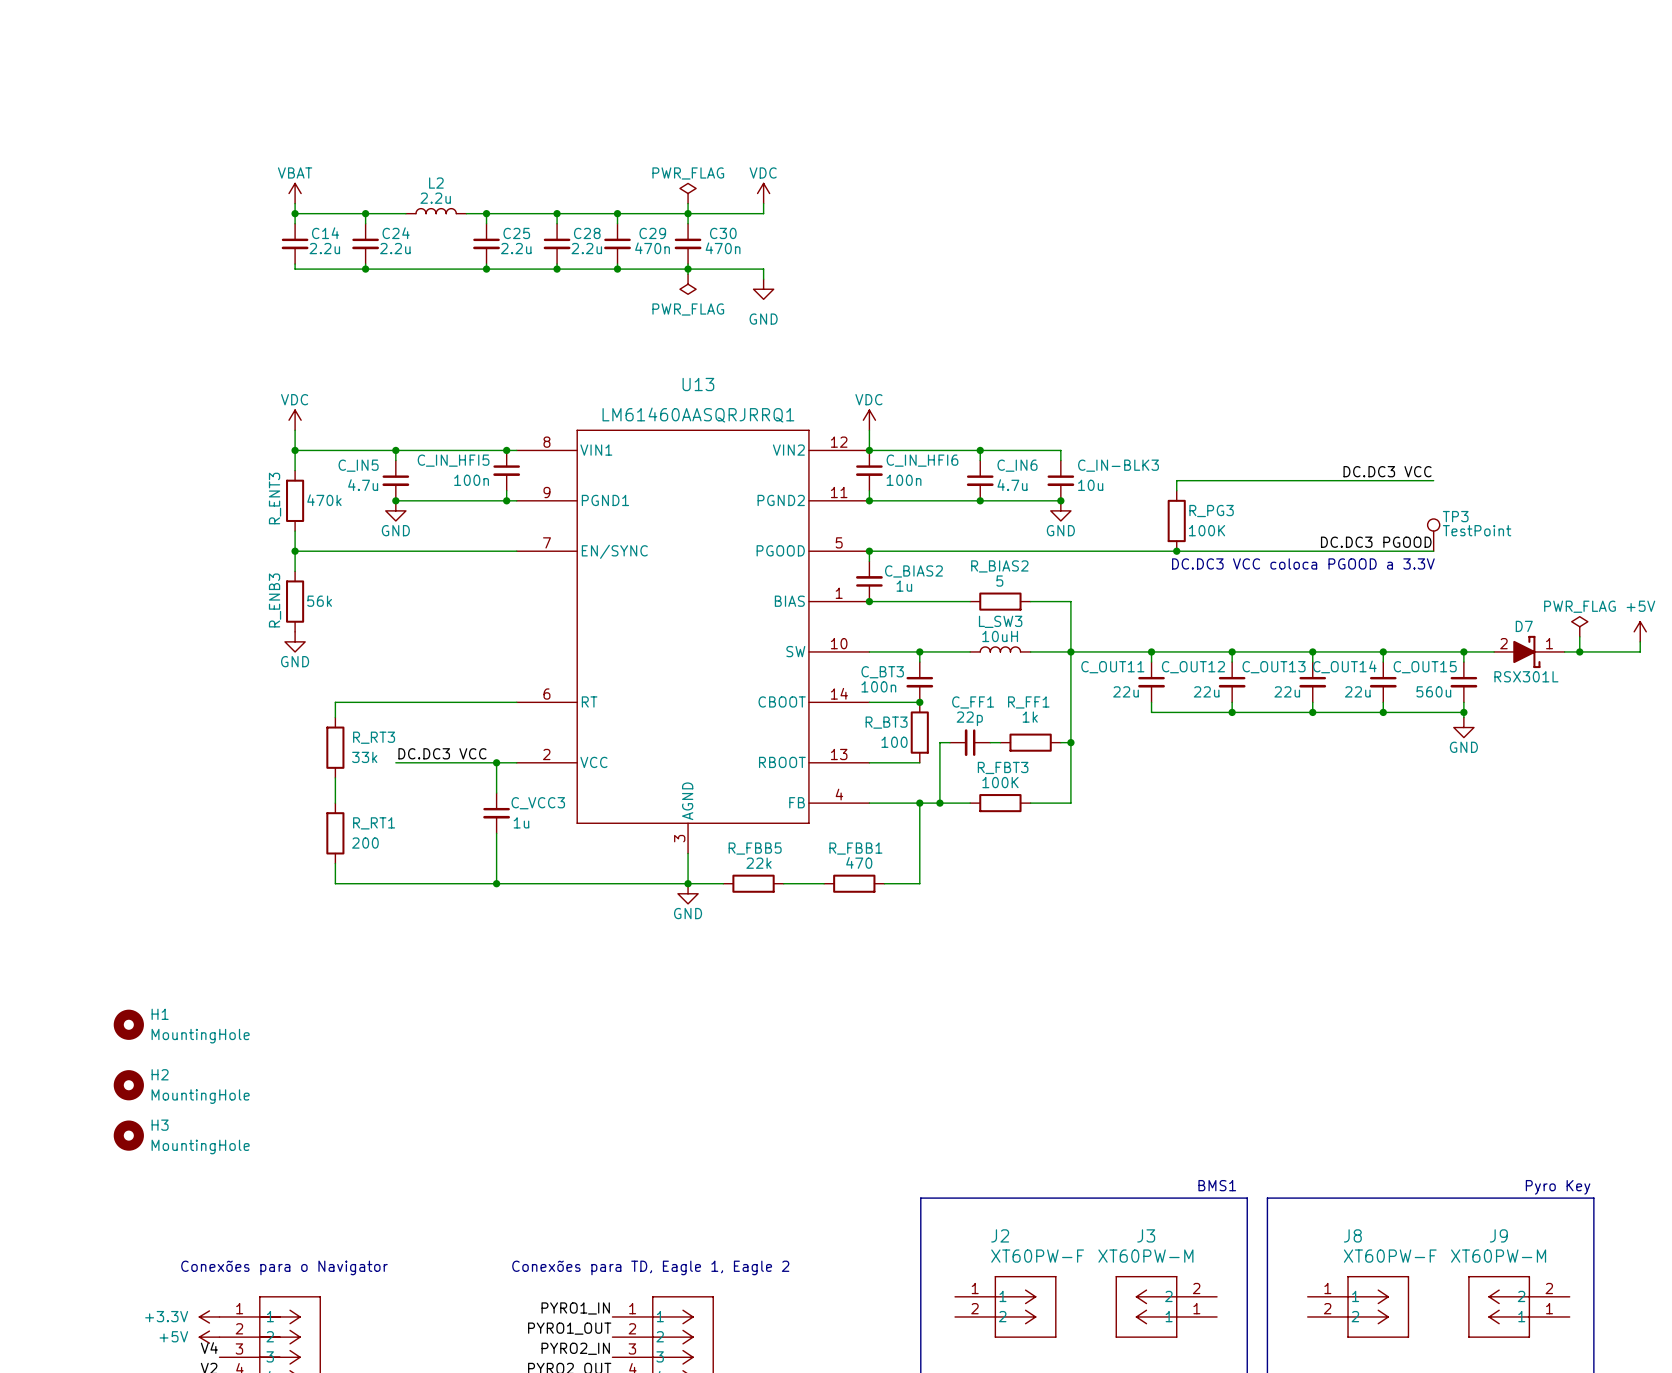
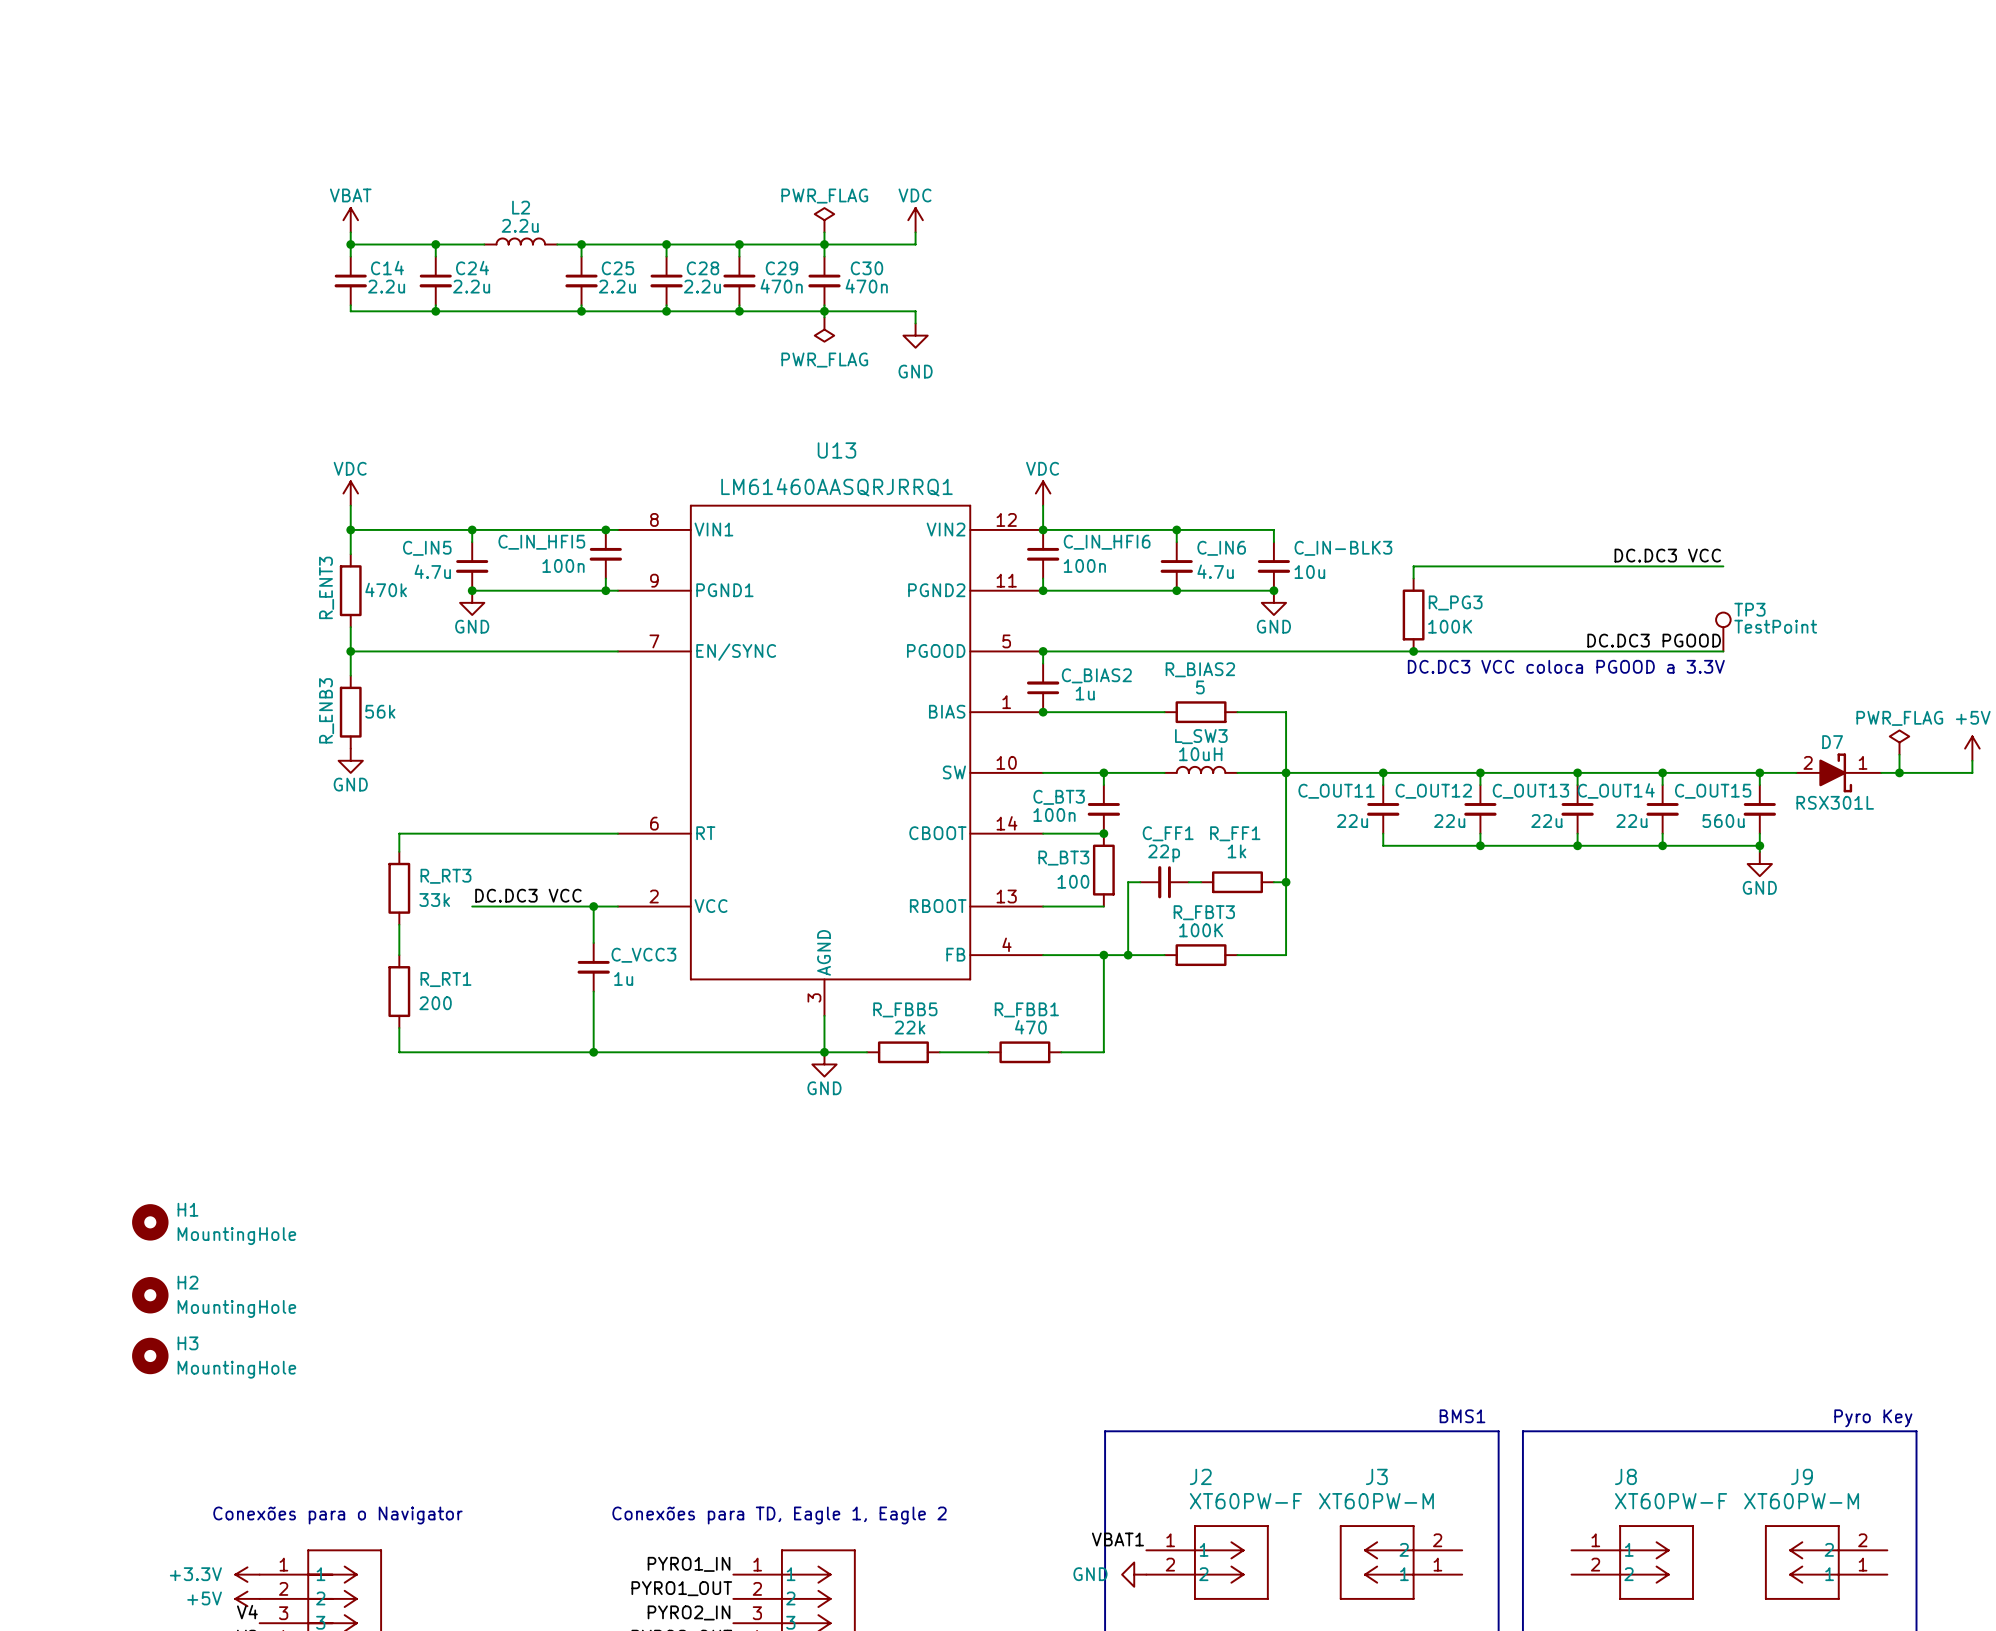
label: none -> VBAT1 (1117, 1539)
power symbol: none -> GND (1134, 1574)

